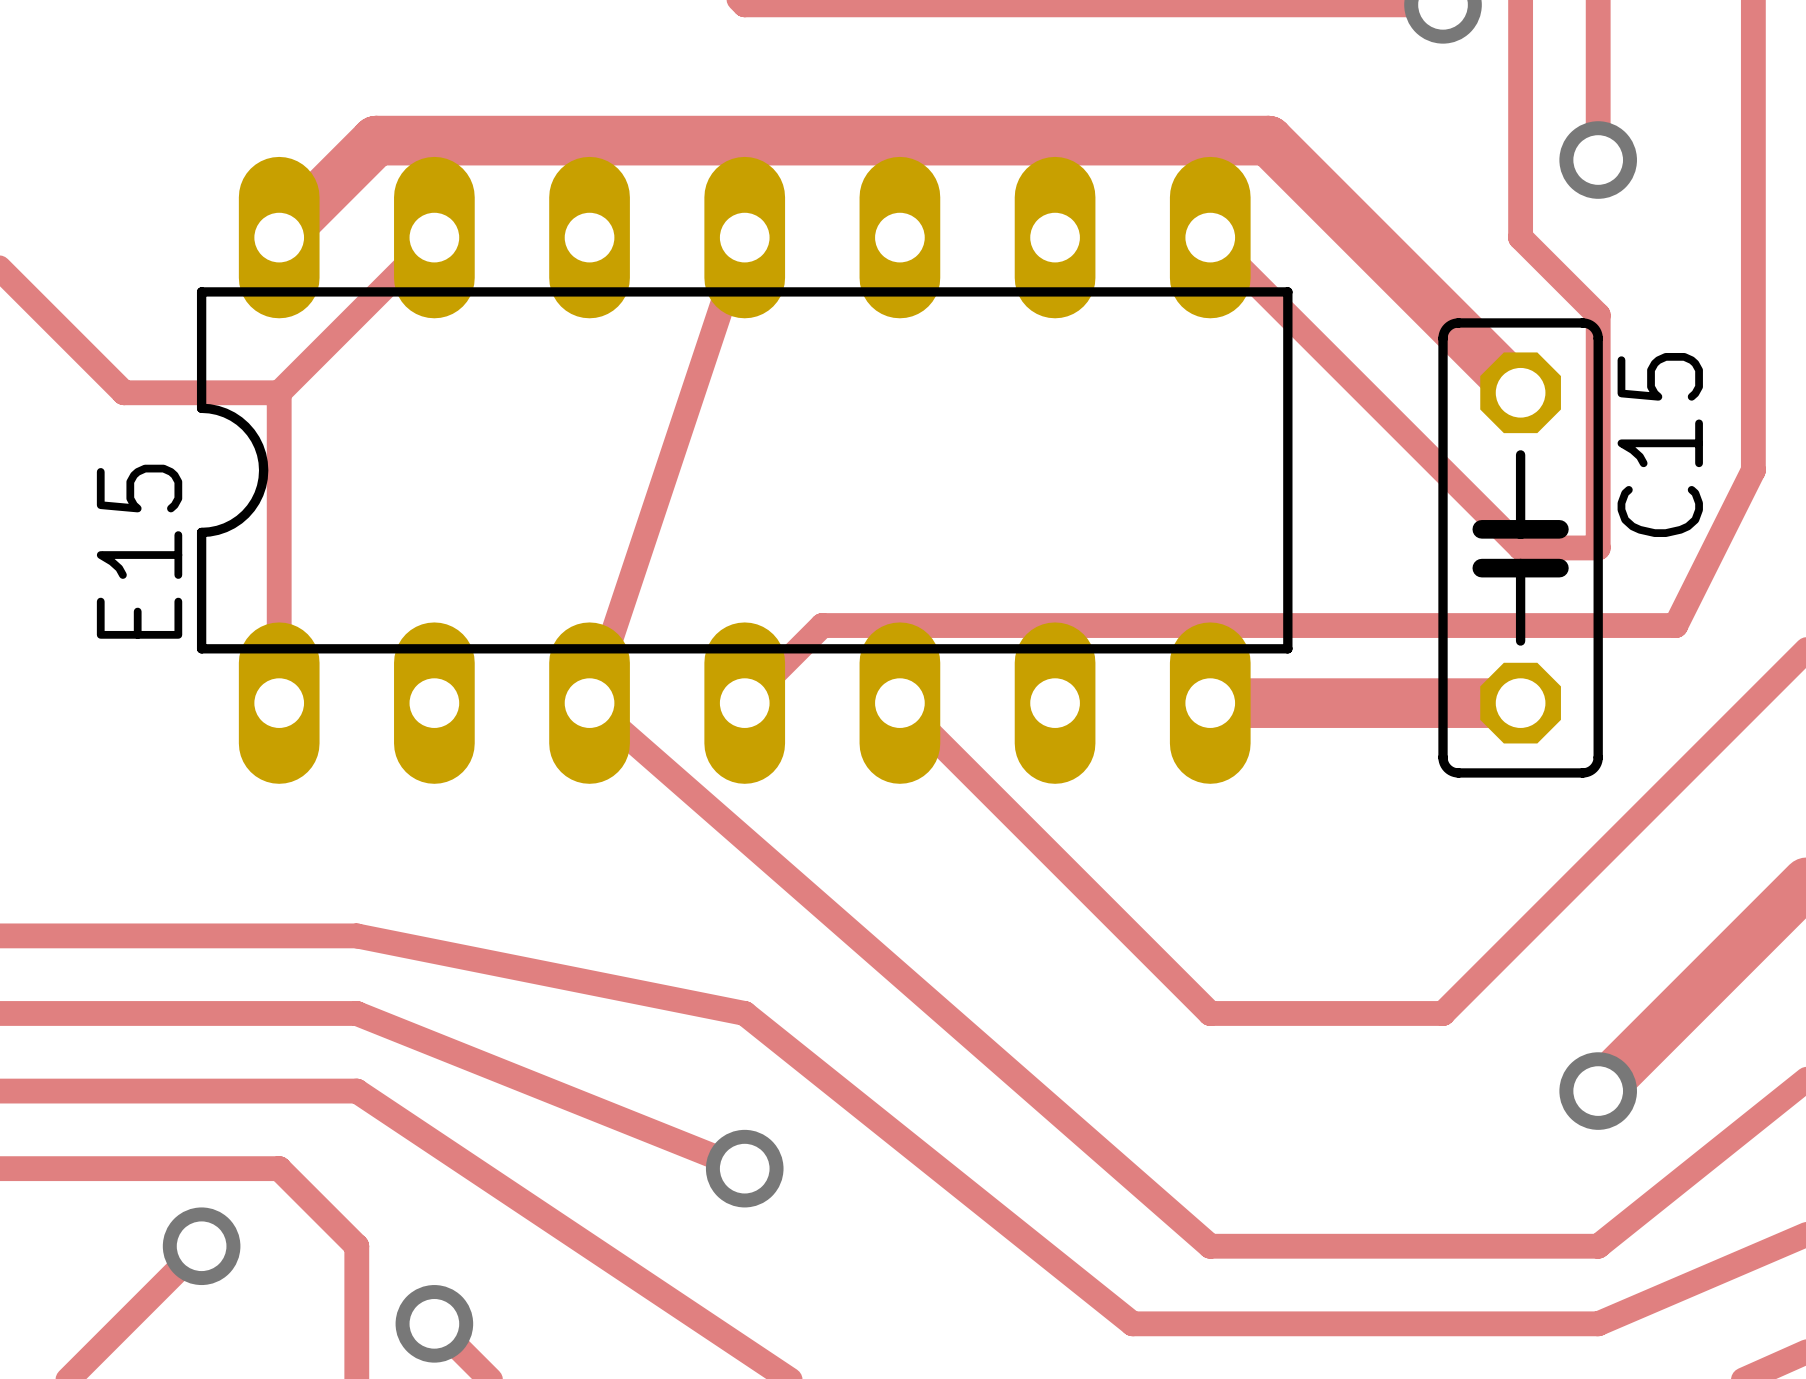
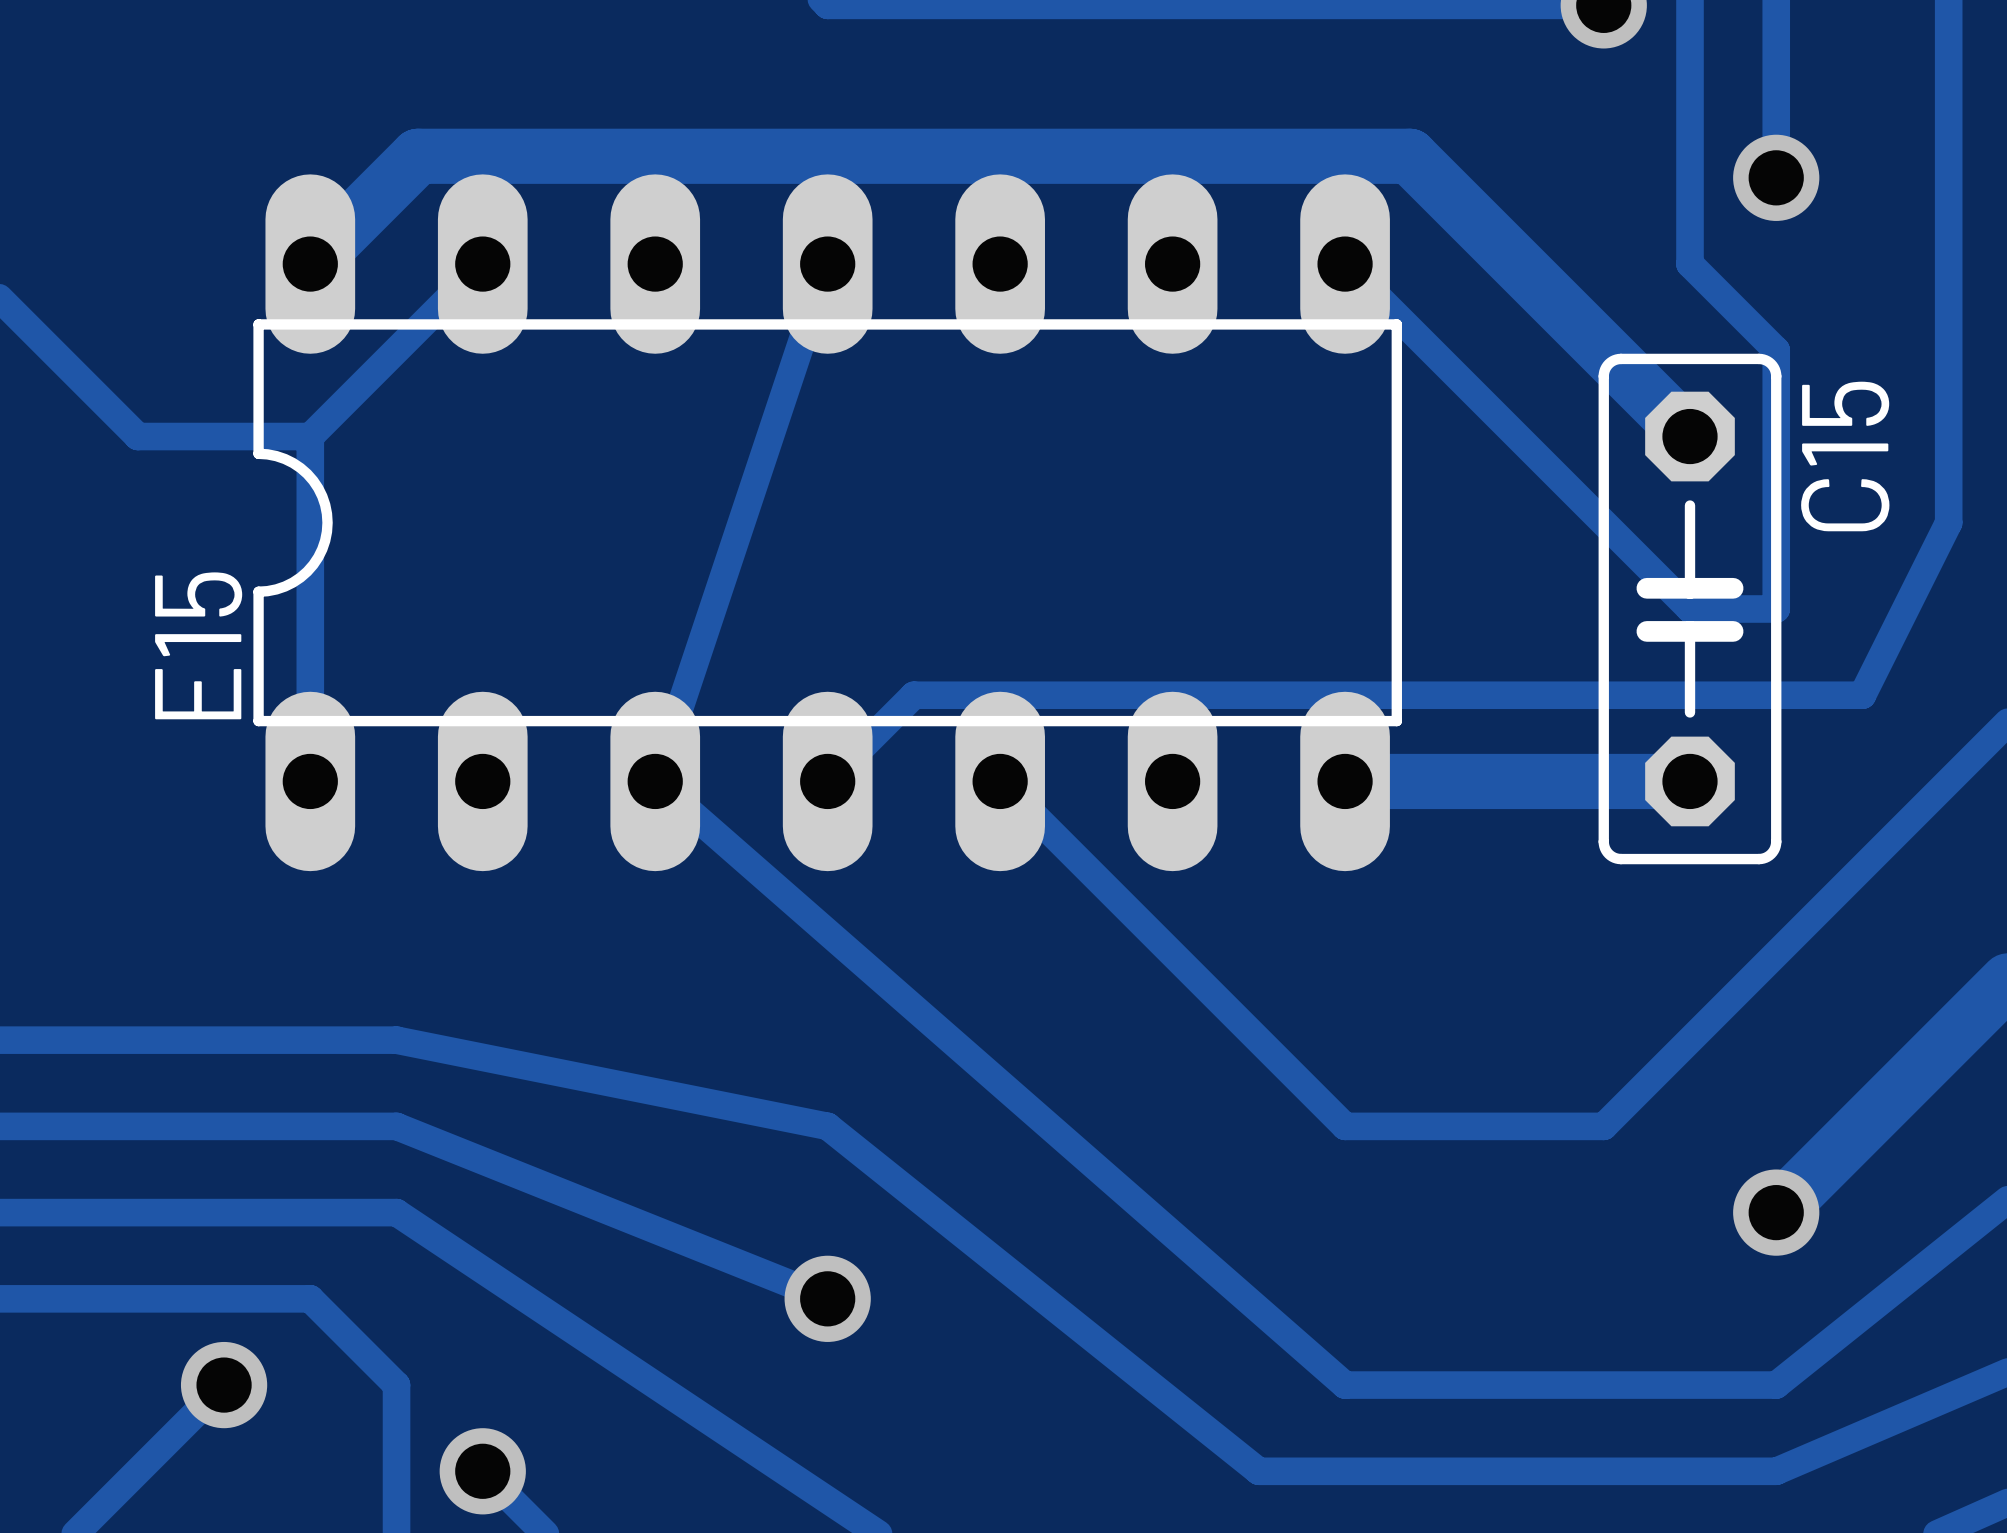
E15 footprint: [196, 156, 1293, 784] -> [253, 174, 1402, 872]
E15 name position: E15 (139, 551) -> E15 (198, 645)

